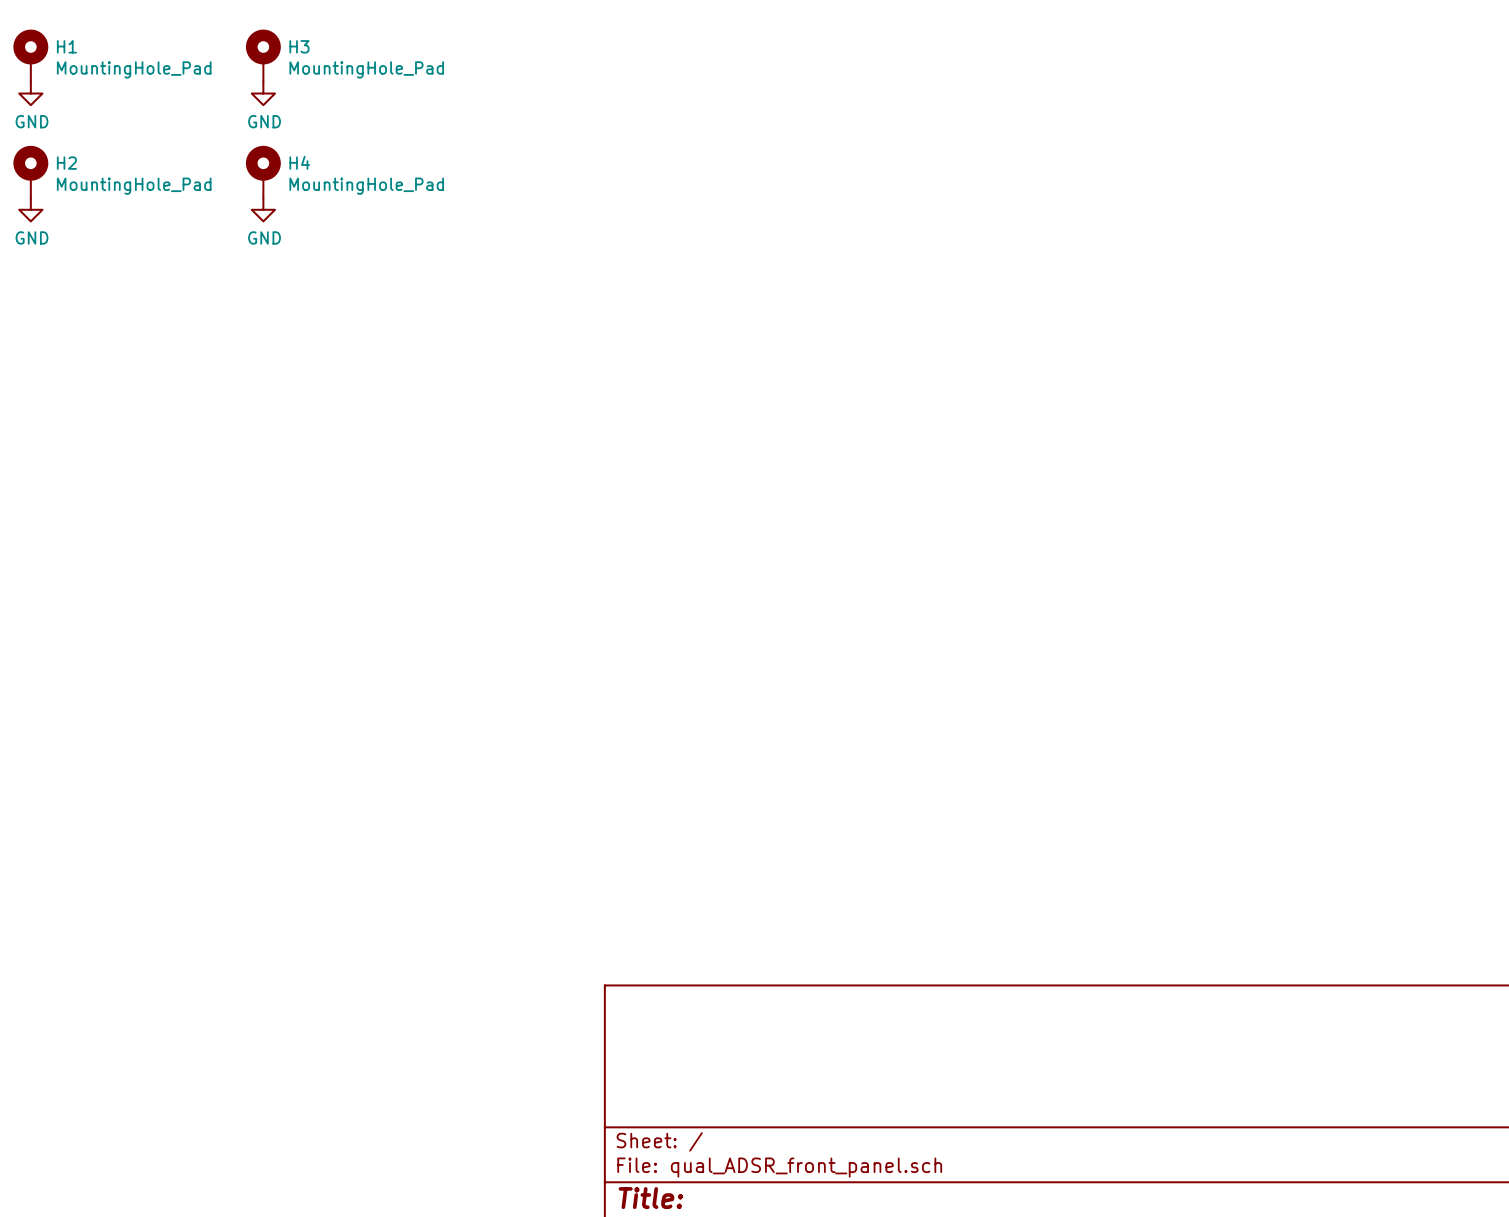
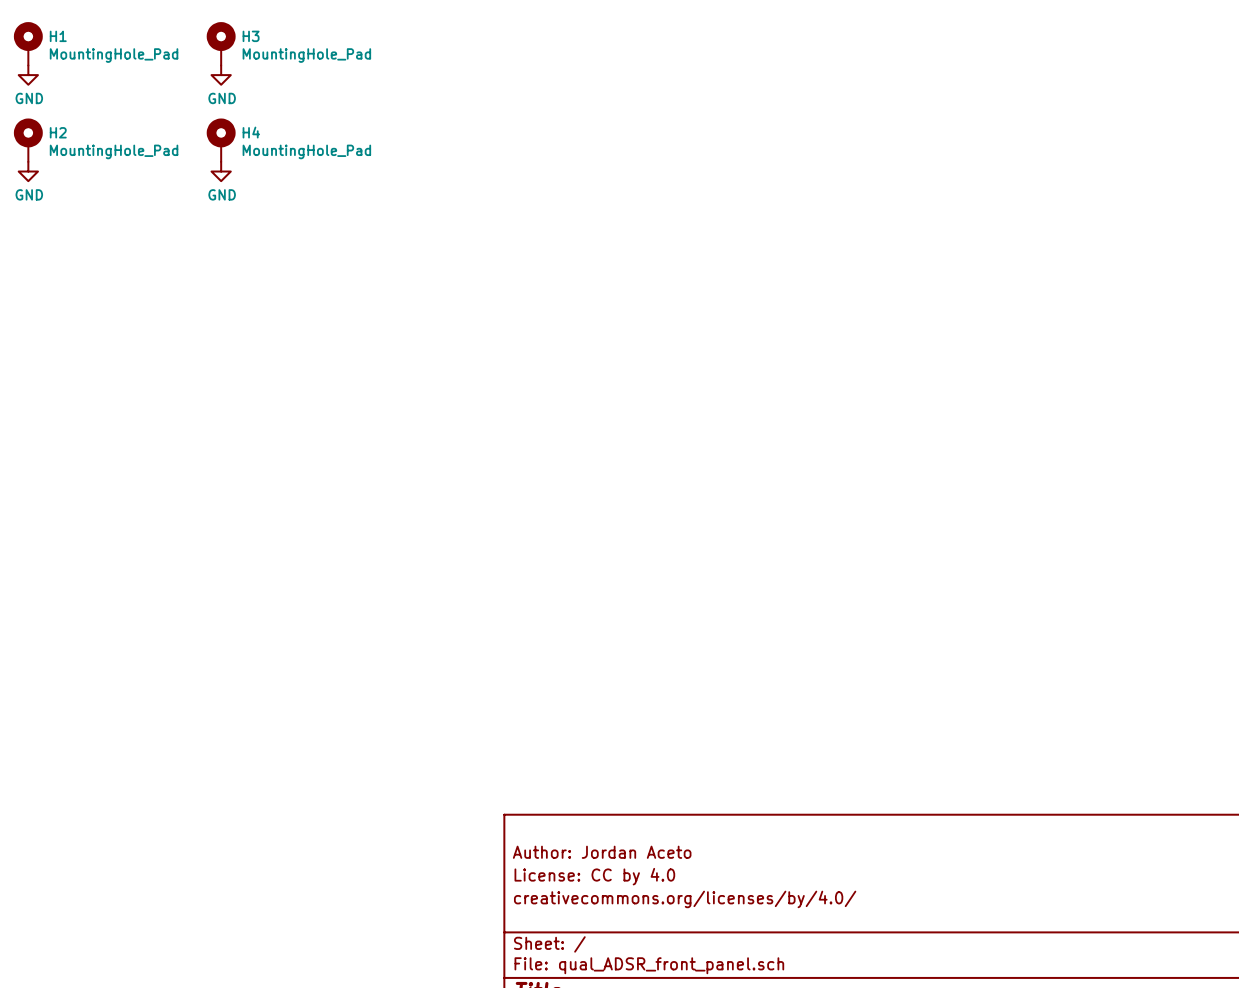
title block: none -> Author: Jordan Aceto (602, 852)
title block: none -> License: CC by 4.0 (594, 876)
title block: none -> creativecommons.org/licenses/by/4.0/ (685, 899)

